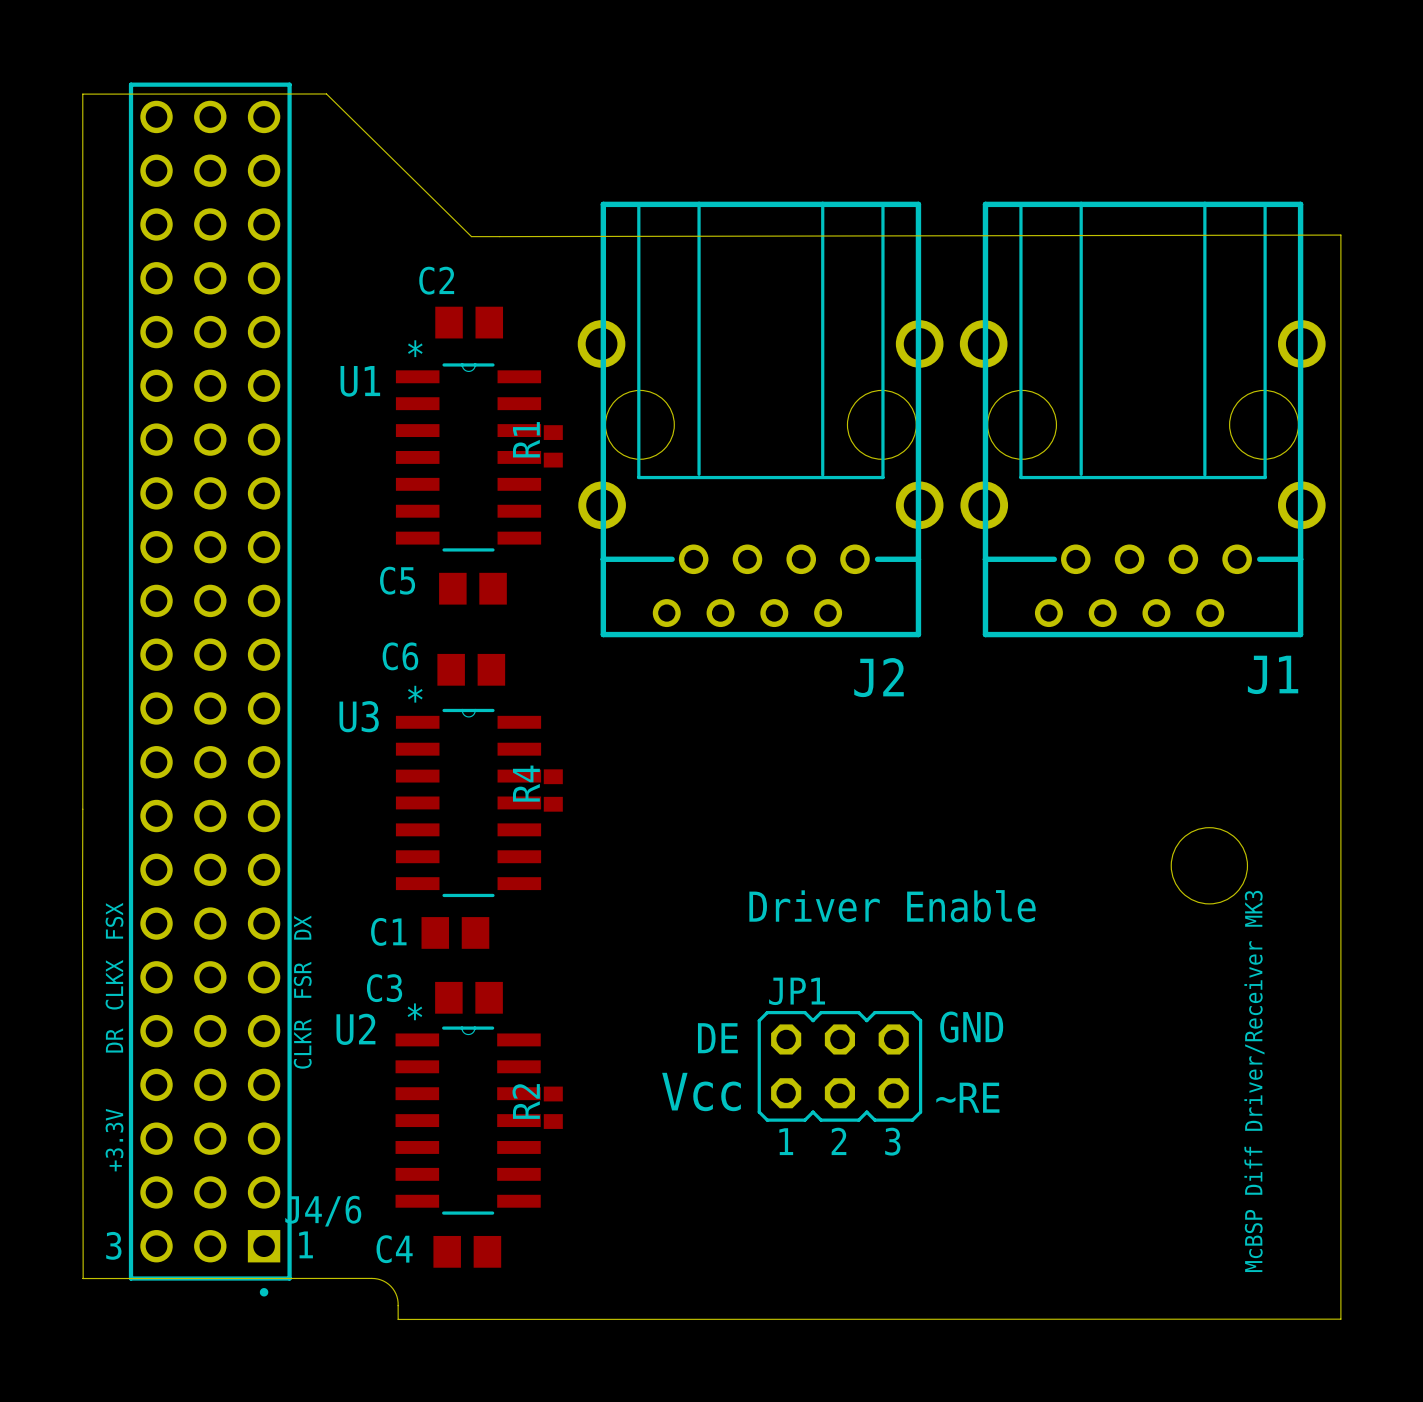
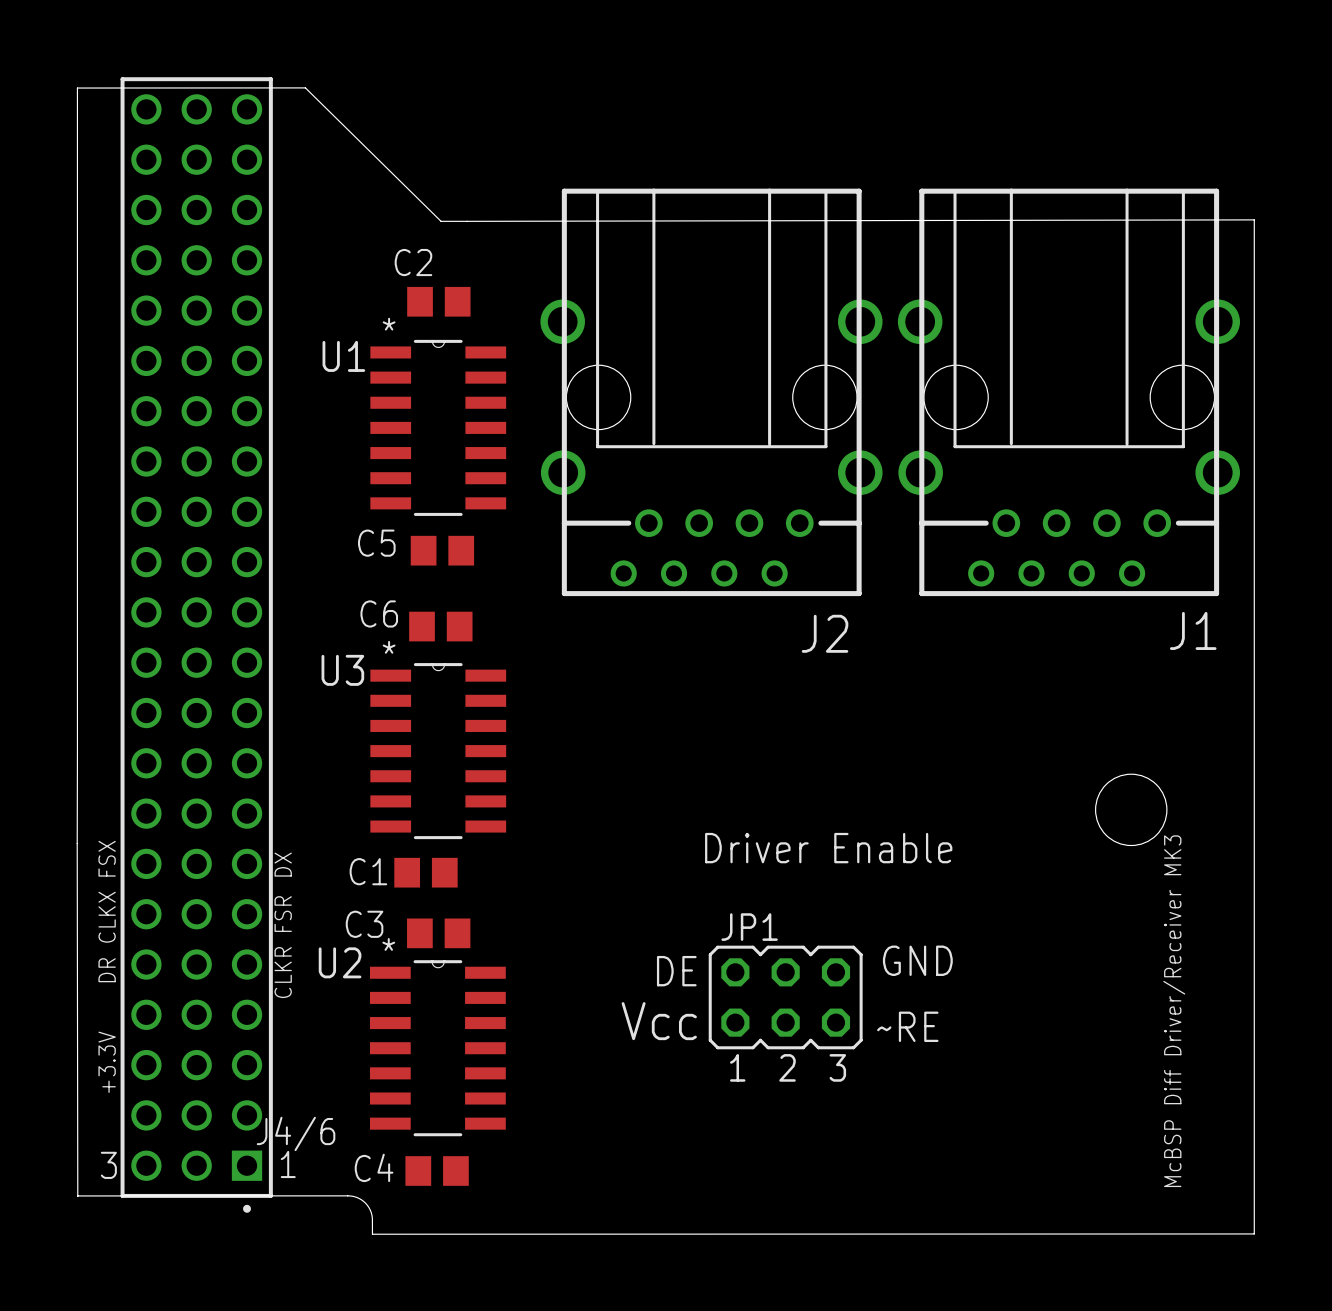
R1: (553, 446) -> none
R4: (553, 790) -> none
R2: (553, 1107) -> none

